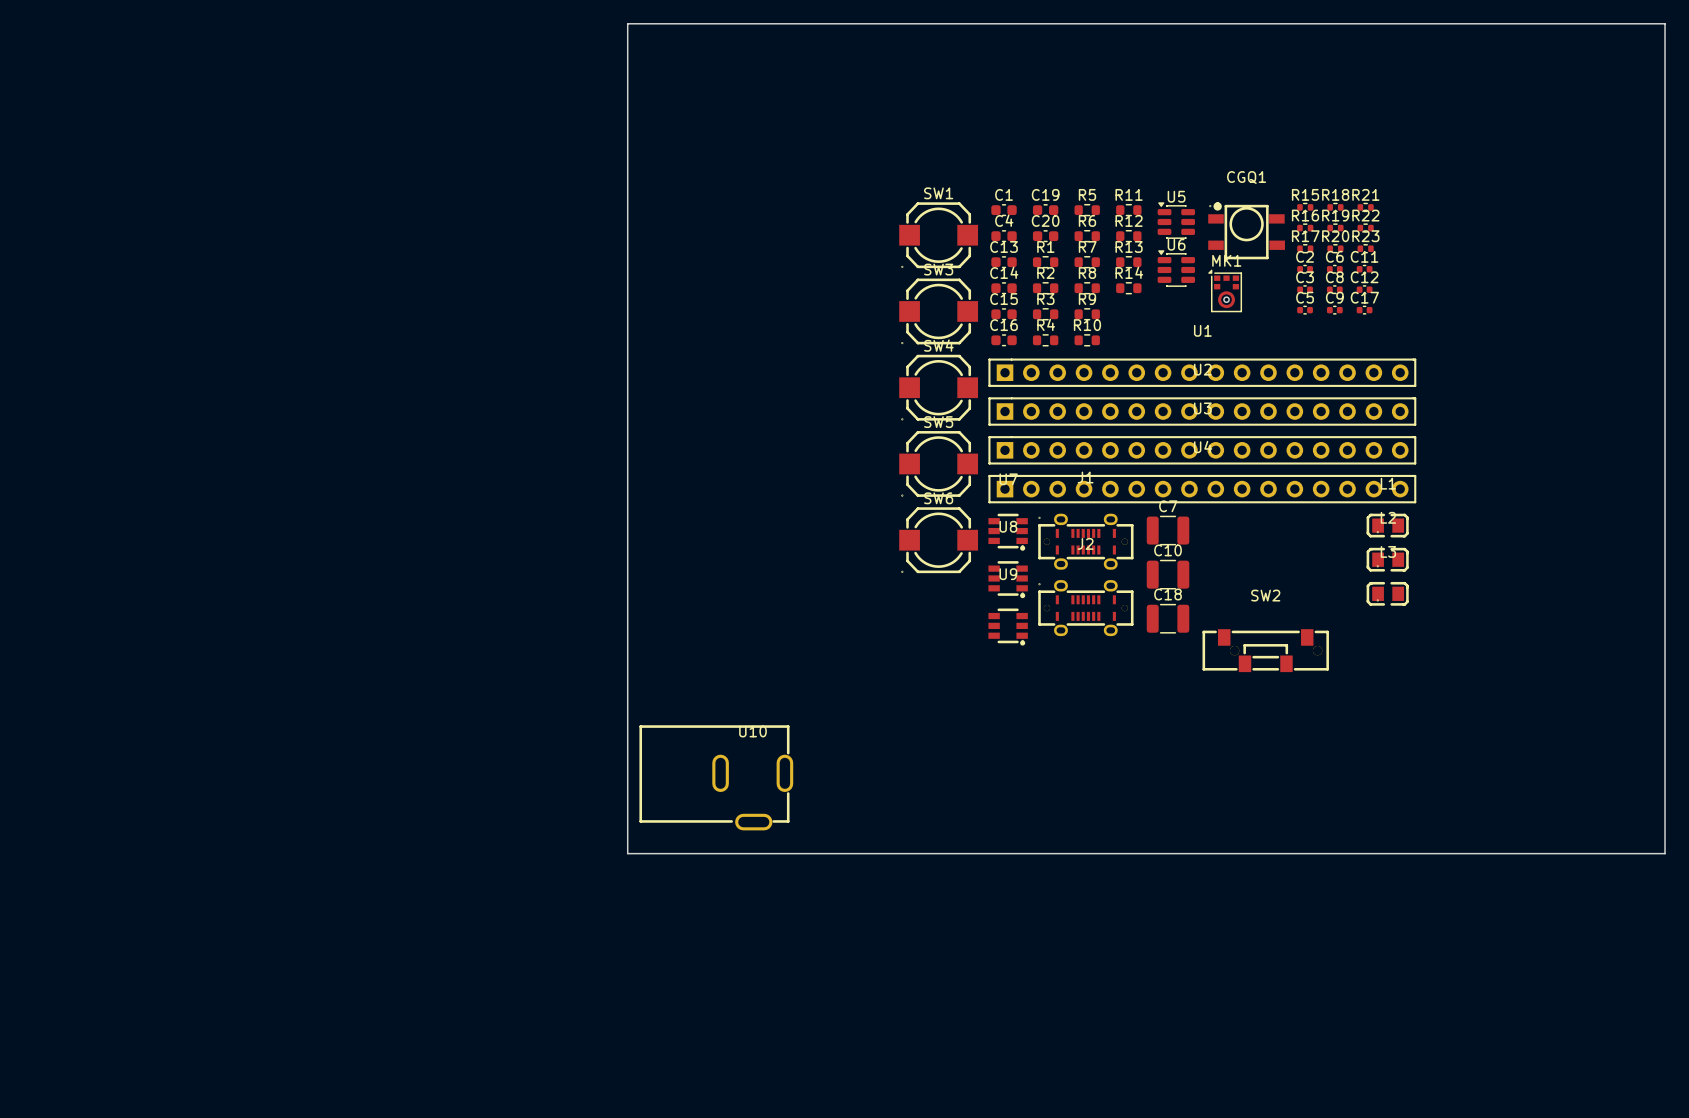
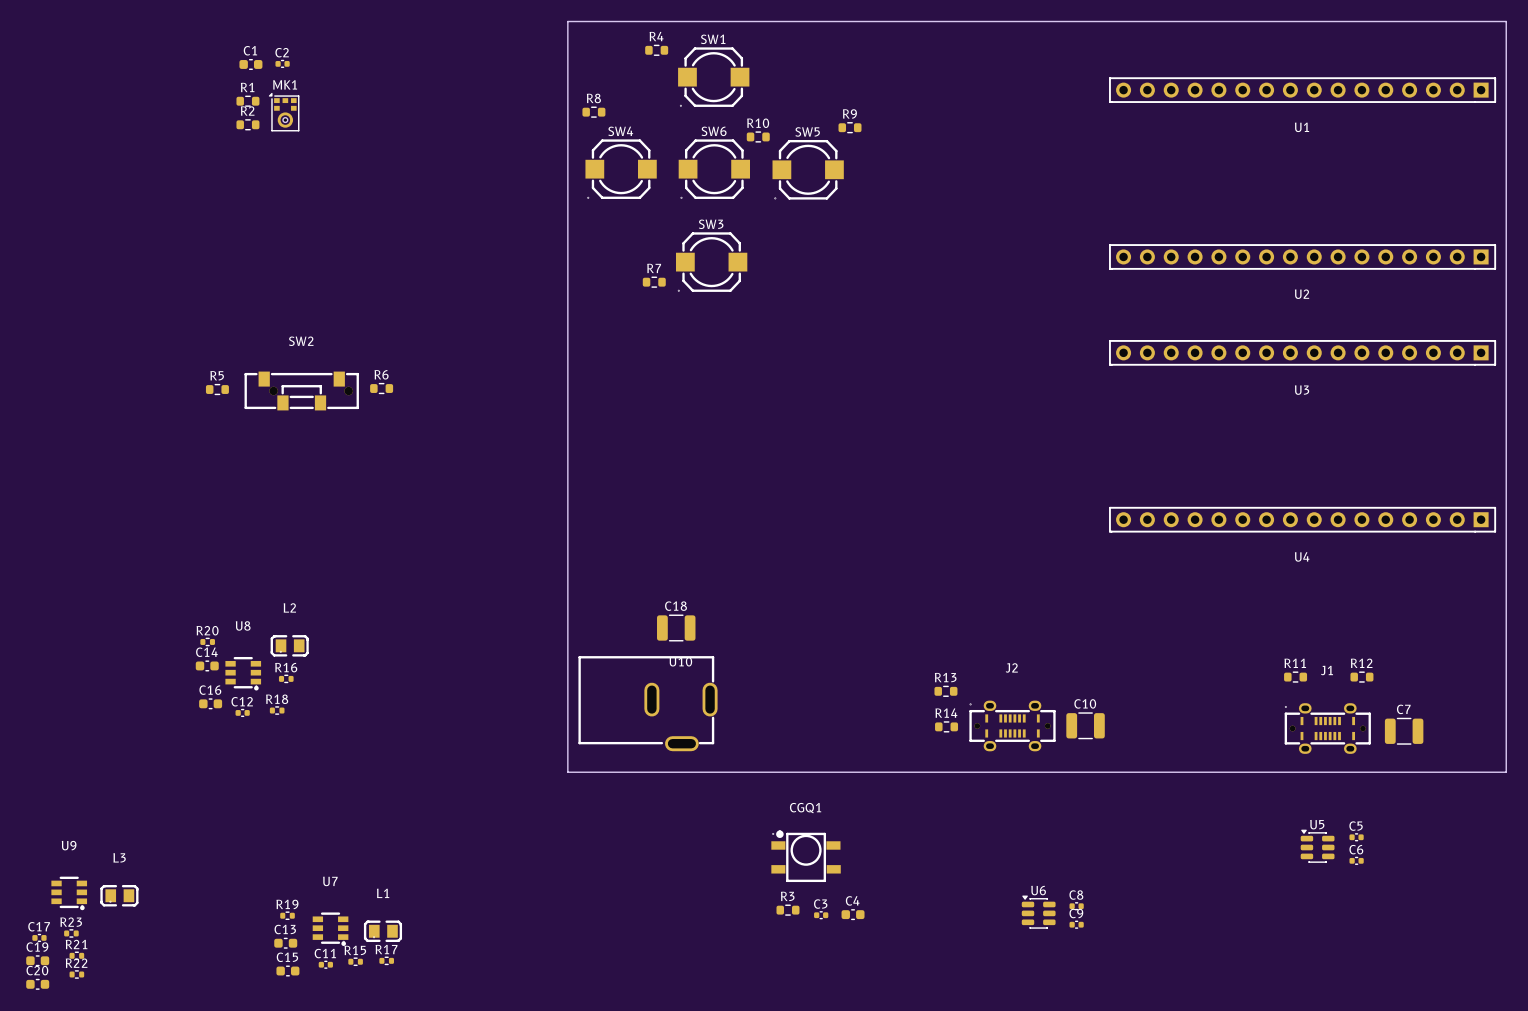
R15 position: (1305, 207) -> (355, 961)
R18 position: (1335, 207) -> (277, 710)
R21 position: (1365, 207) -> (76, 955)
C1 position: (1004, 210) -> (250, 64)
C19 position: (1045, 210) -> (37, 960)
R5 position: (1087, 210) -> (217, 389)
R11 position: (1128, 210) -> (1295, 677)
U5 position: (1176, 220) -> (1317, 846)
R16 position: (1305, 228) -> (286, 678)
R19 position: (1335, 228) -> (287, 915)
R22 position: (1365, 228) -> (76, 974)
CGQ1 position: (1246, 230) -> (806, 856)
SW1 position: (938, 235) -> (713, 77)
C4 position: (1004, 236) -> (853, 914)
C20 position: (1045, 236) -> (37, 984)
R6 position: (1087, 236) -> (381, 388)
R12 position: (1128, 236) -> (1361, 677)
R17 position: (1305, 248) -> (386, 960)
R20 position: (1335, 248) -> (207, 641)
R23 position: (1365, 248) -> (71, 933)
C13 position: (1004, 262) -> (285, 943)
R1 position: (1045, 262) -> (247, 101)
R7 position: (1087, 262) -> (654, 282)
R13 position: (1128, 262) -> (945, 691)
U6 position: (1176, 268) -> (1038, 912)
C2 position: (1305, 269) -> (282, 63)
C6 position: (1334, 269) -> (1356, 860)
C11 position: (1364, 269) -> (325, 964)
C14 position: (1004, 288) -> (207, 665)
R2 position: (1045, 288) -> (247, 124)
R8 position: (1087, 288) -> (593, 112)
R14 position: (1128, 288) -> (946, 726)
C3 position: (1305, 289) -> (821, 915)
C8 position: (1334, 289) -> (1076, 906)
C12 position: (1364, 289) -> (242, 712)
MK1 position: (1225, 290) -> (284, 112)
C5 position: (1305, 310) -> (1356, 837)
C9 position: (1334, 310) -> (1076, 924)
C17 position: (1364, 310) -> (39, 937)
SW3 position: (938, 311) -> (711, 262)
C15 position: (1004, 314) -> (287, 971)
R3 position: (1045, 314) -> (787, 910)
R9 position: (1087, 314) -> (850, 127)
C16 position: (1004, 340) -> (210, 703)
R4 position: (1045, 340) -> (656, 50)
R10 position: (1087, 340) -> (758, 136)
U1 rotation: 0° (1202, 372) -> 180° (1302, 90)
U1 position: (1202, 372) -> (1302, 90)
SW4 position: (938, 387) -> (621, 169)
U2 rotation: 0° (1202, 411) -> 180° (1302, 256)
U2 position: (1202, 411) -> (1302, 256)
U3 rotation: 0° (1202, 450) -> 180° (1302, 352)
SW5 position: (938, 463) -> (808, 169)
U4 rotation: 0° (1202, 489) -> 180° (1302, 519)
L1 position: (1387, 525) -> (382, 931)
C7 position: (1168, 530) -> (1404, 731)
U7 position: (1008, 532) -> (330, 929)
SW6 position: (938, 540) -> (714, 169)
J1 position: (1085, 541) -> (1327, 728)
L2 position: (1387, 559) -> (289, 645)
C10 position: (1168, 574) -> (1085, 725)
U8 position: (1008, 579) -> (243, 673)
L3 position: (1387, 593) -> (119, 895)
J2 position: (1085, 608) -> (1012, 725)
C18 position: (1168, 618) -> (676, 628)
U9 position: (1008, 627) -> (69, 893)
SW2 position: (1265, 650) -> (301, 391)

